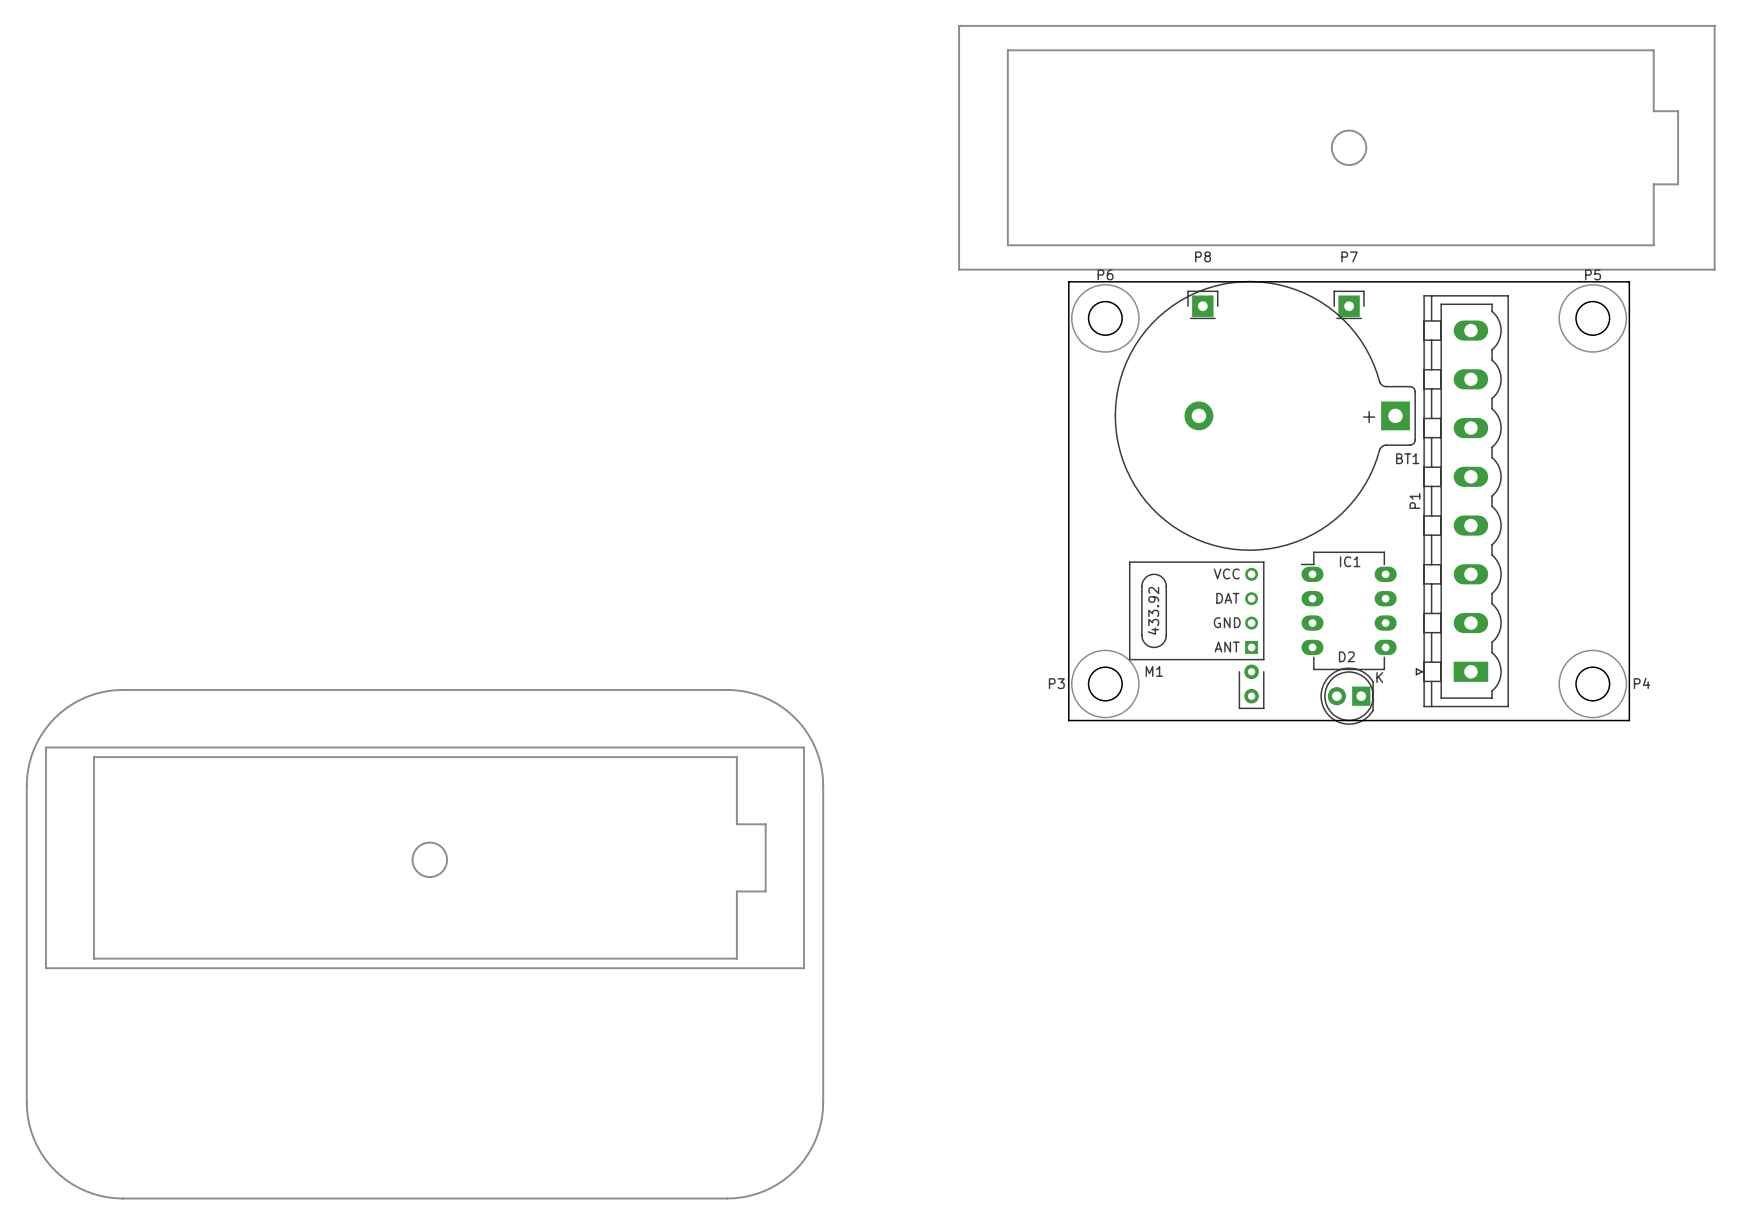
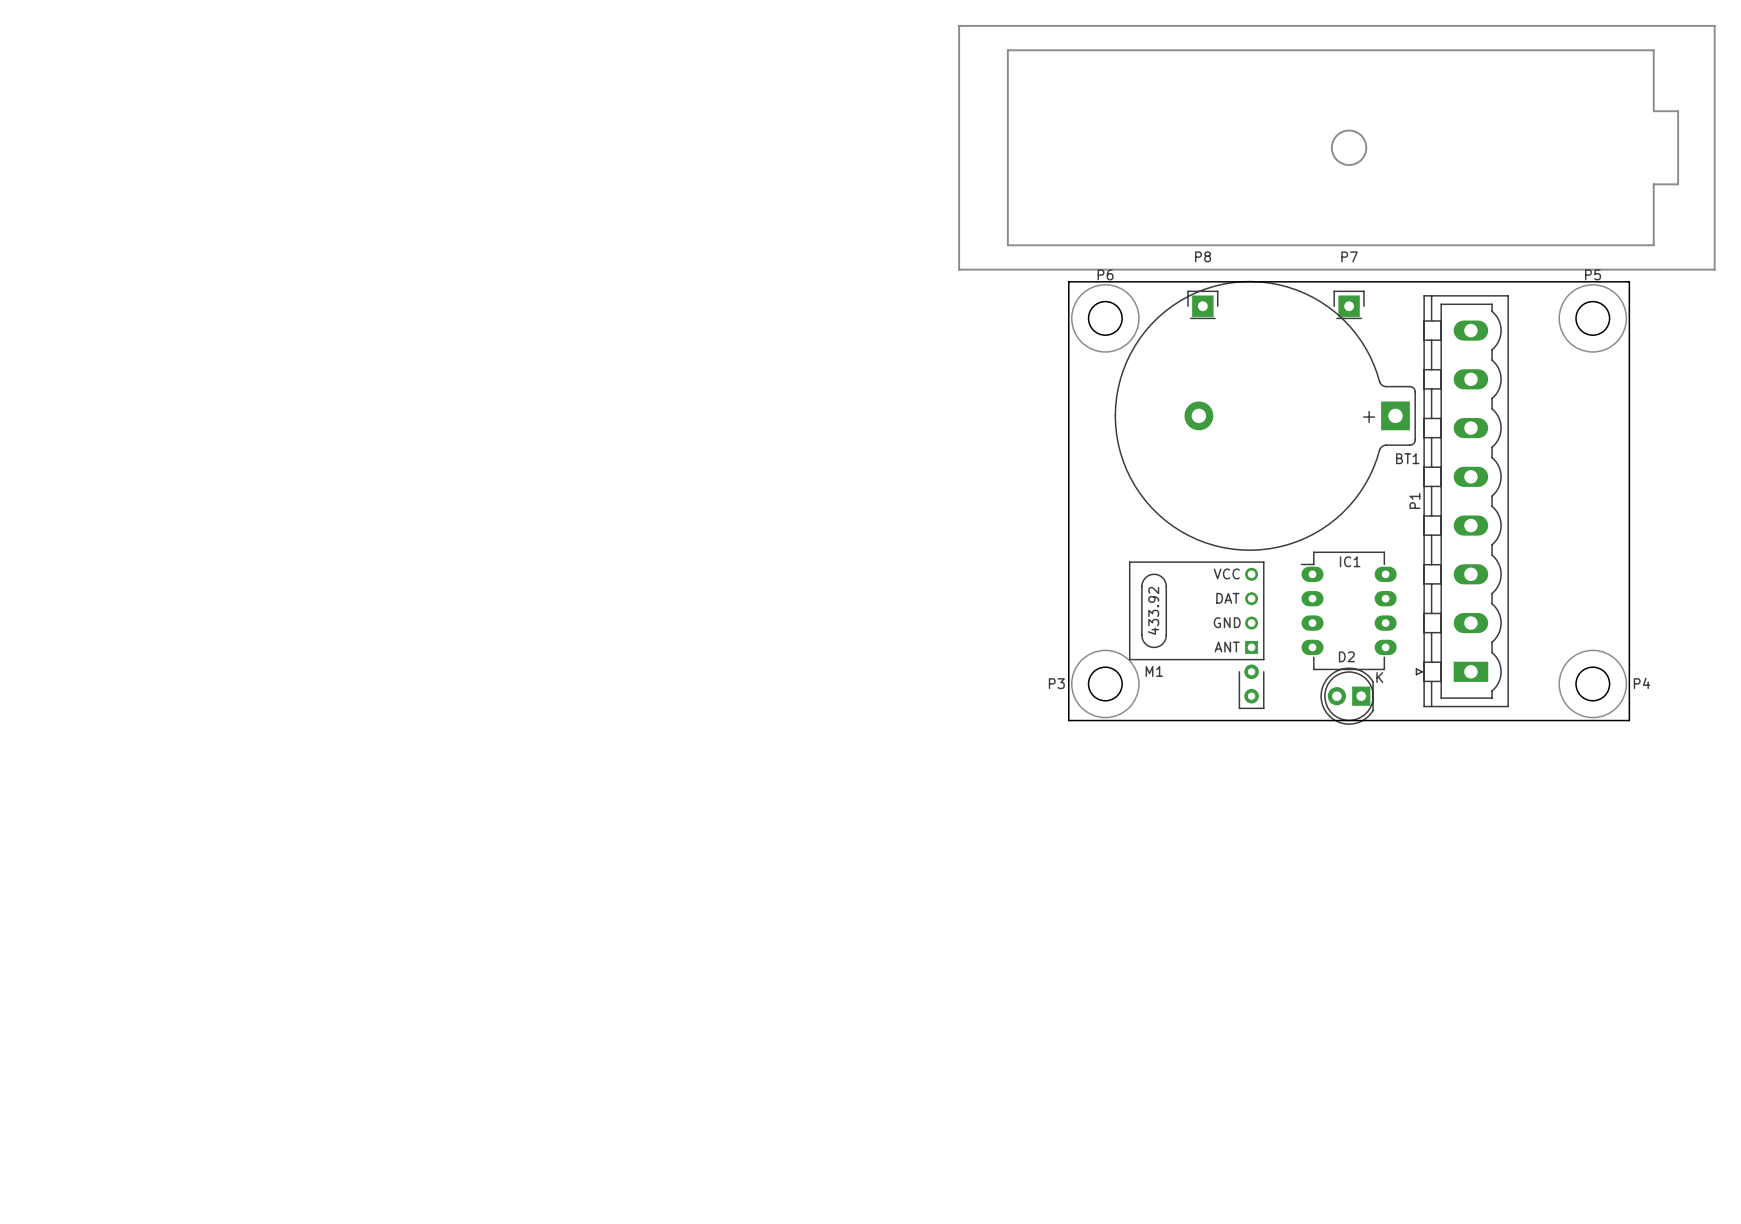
line: (122, 689) (727, 689) (756, 694) (783, 708) (800, 723) (809, 735) (818, 756) (822, 778) (822, 1110) (815, 1139) (804, 1158) (789, 1175) (770, 1188) (749, 1195) (727, 1198) (122, 1198) (93, 1193) (66, 1180) (49, 1164) (37, 1146) (31, 1132) (27, 1110) (27, 778) (31, 756) (37, 742) (49, 723) (60, 712) (86, 697) (107, 691) (122, 689) -> none
line: (45, 747) (45, 968) (804, 968) (804, 747) (45, 747) -> none
line: (93, 757) (93, 958) (736, 958) (736, 891) (765, 891) (765, 824) (736, 824) (736, 757) (93, 757) -> none
drawing: [411, 841, 448, 879] -> none

